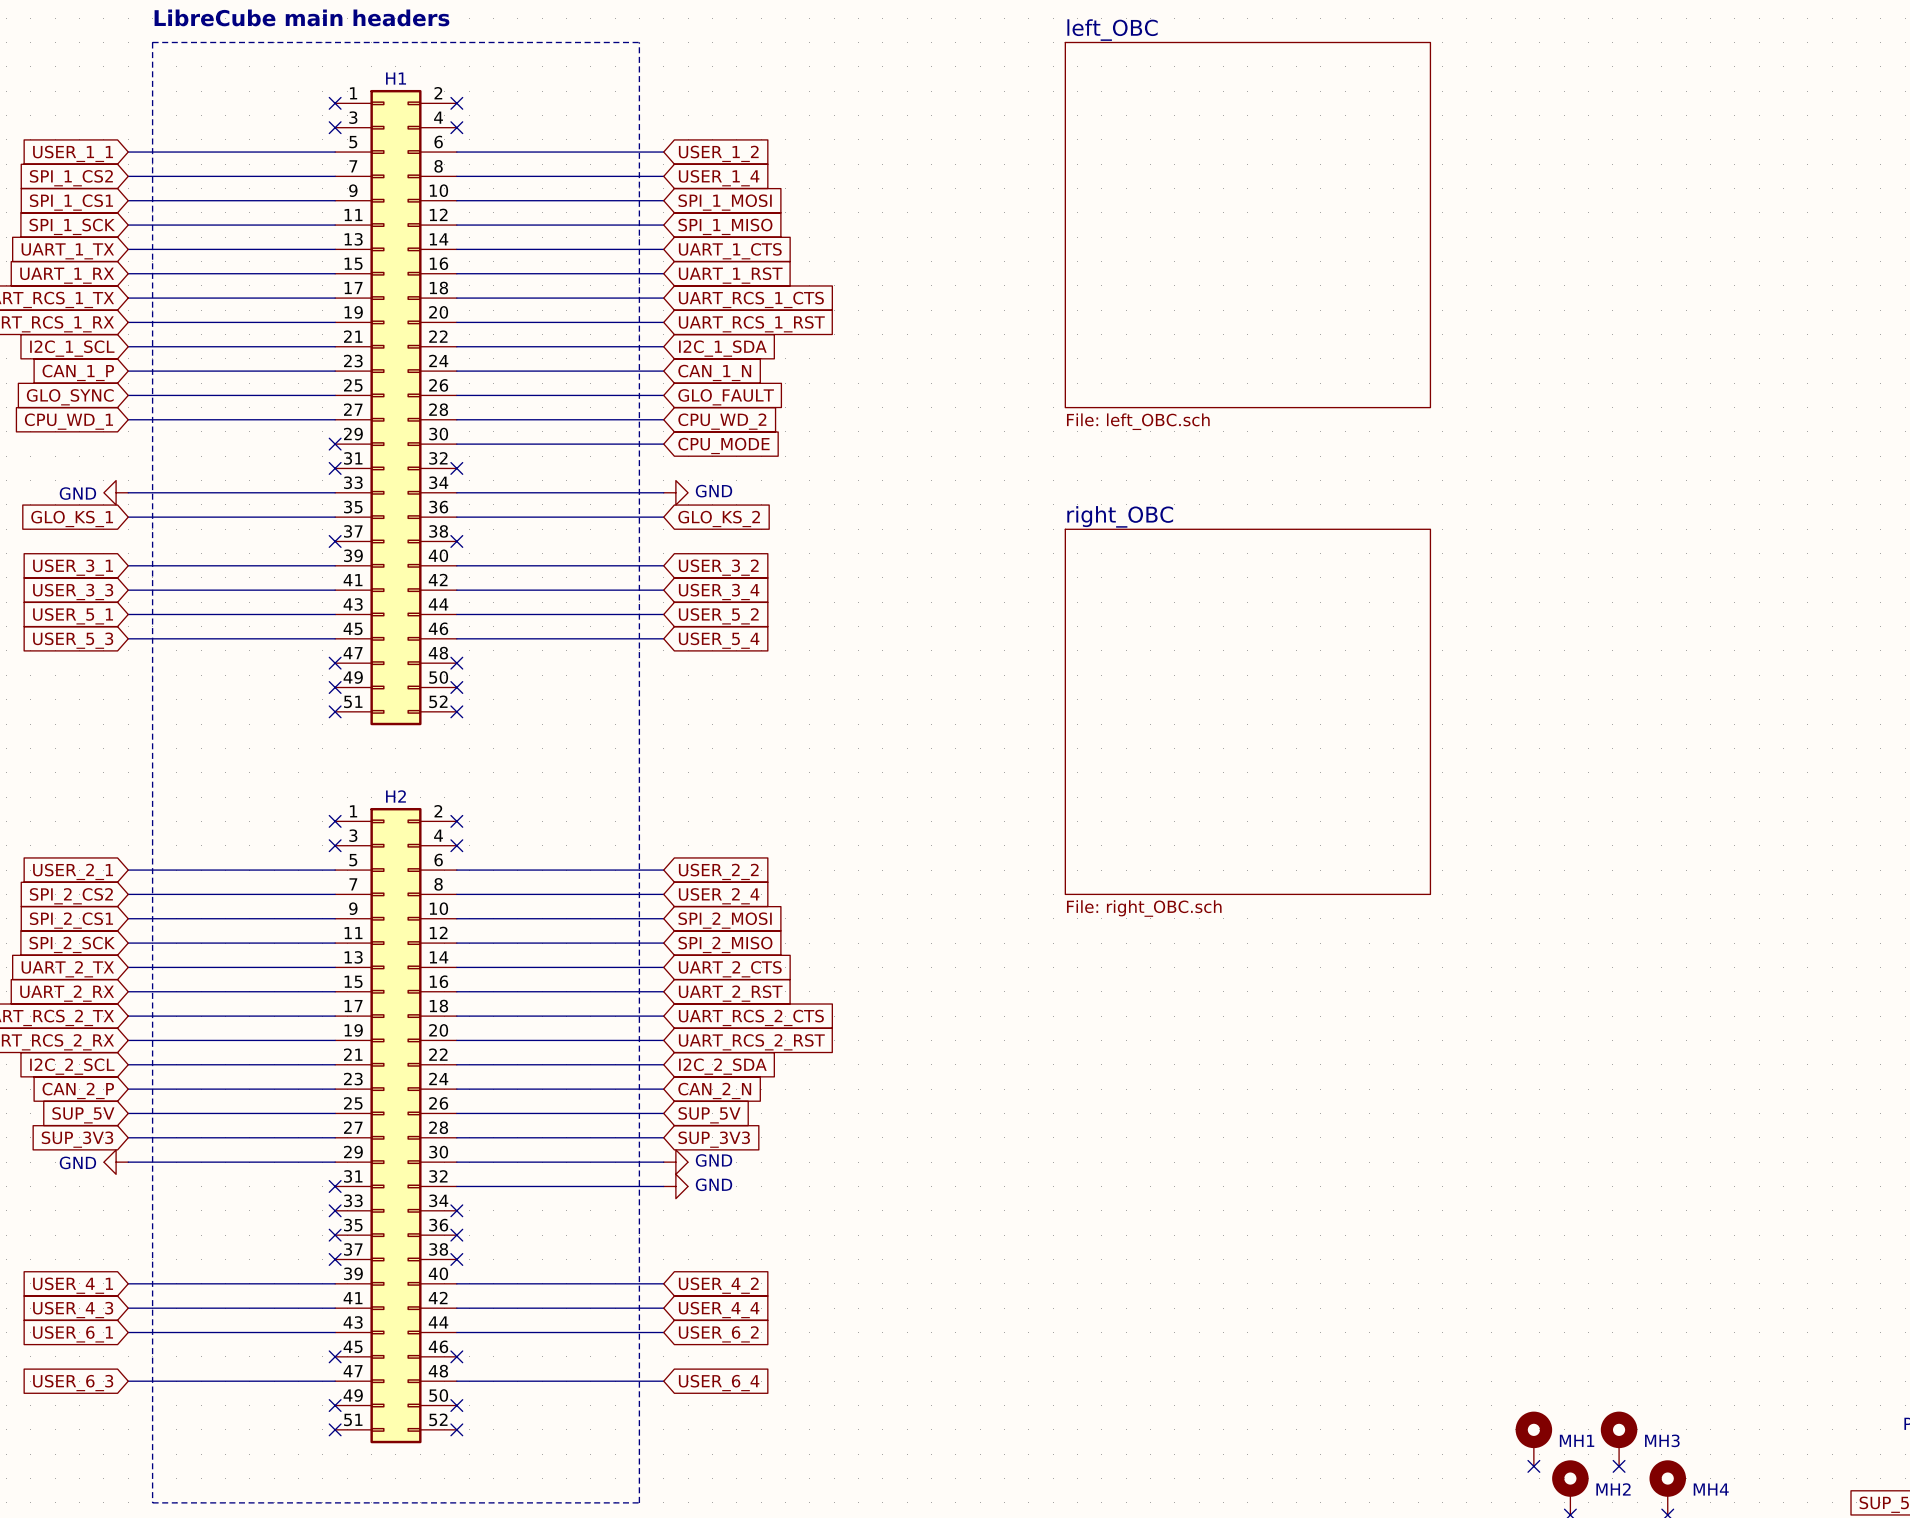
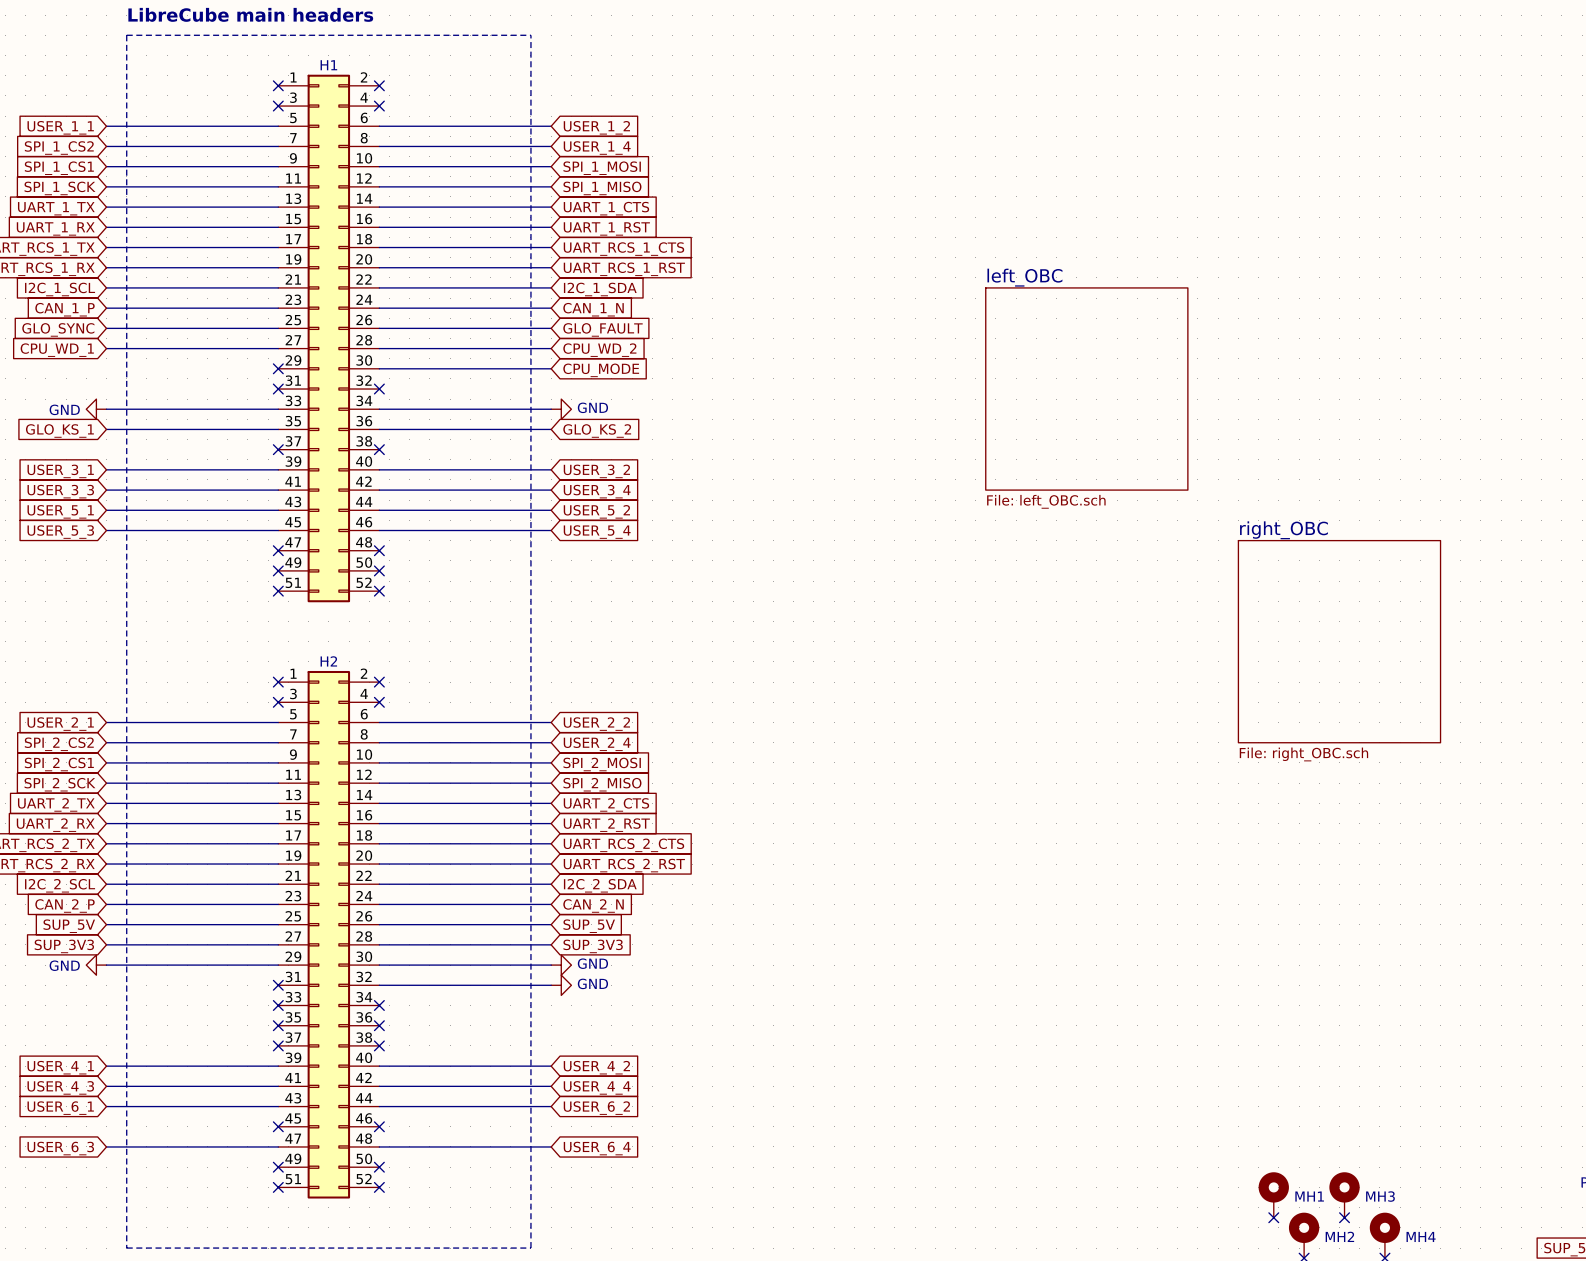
sheet left_OBC: File: left_OBC.sch (1247, 225) -> none
sheet left_OBC: none -> File: left_OBC.sch (1086, 389)
sheet right_OBC: File: right_OBC.sch (1247, 711) -> none
sheet right_OBC: none -> File: right_OBC.sch (1339, 641)

